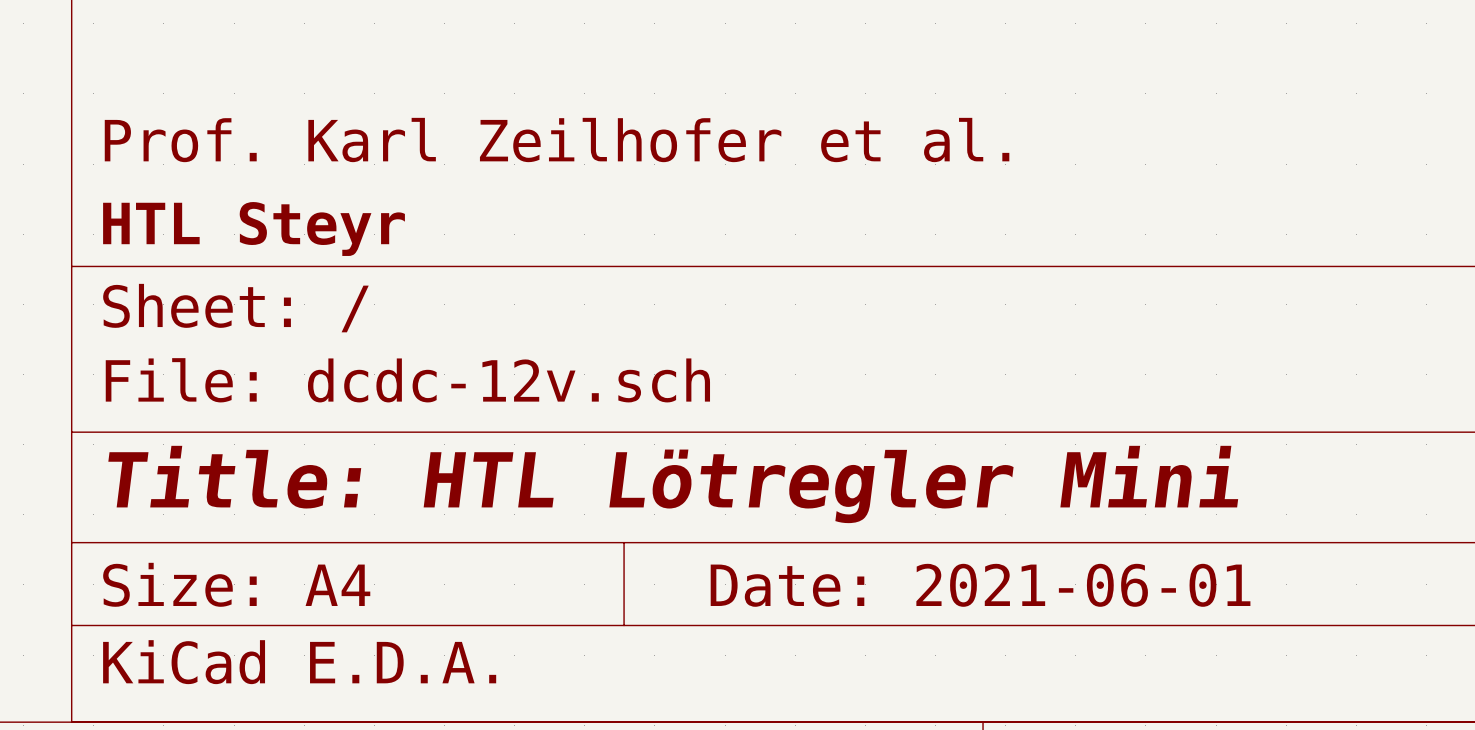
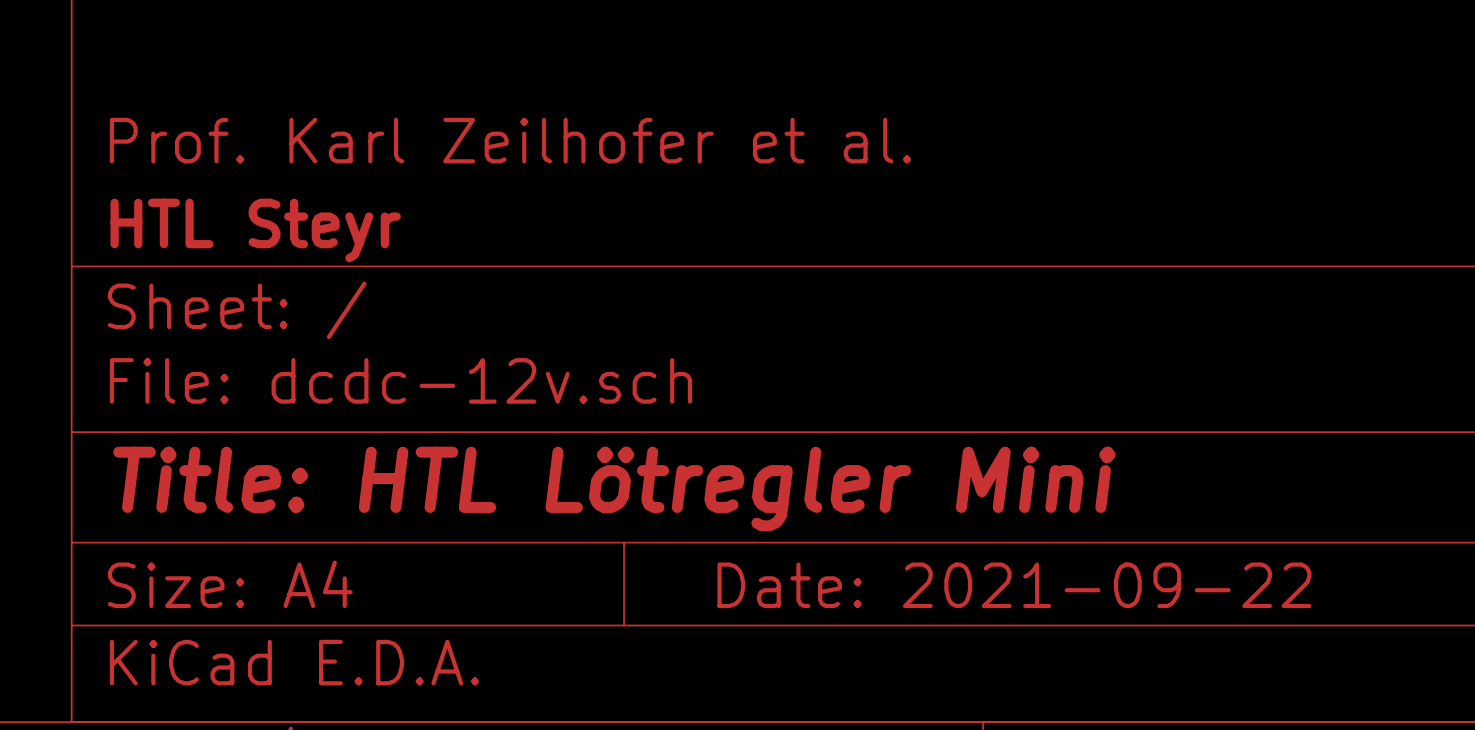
title block: Date: 2021-06-01 (980, 585) -> Date: 2021-09-22 (1014, 585)

